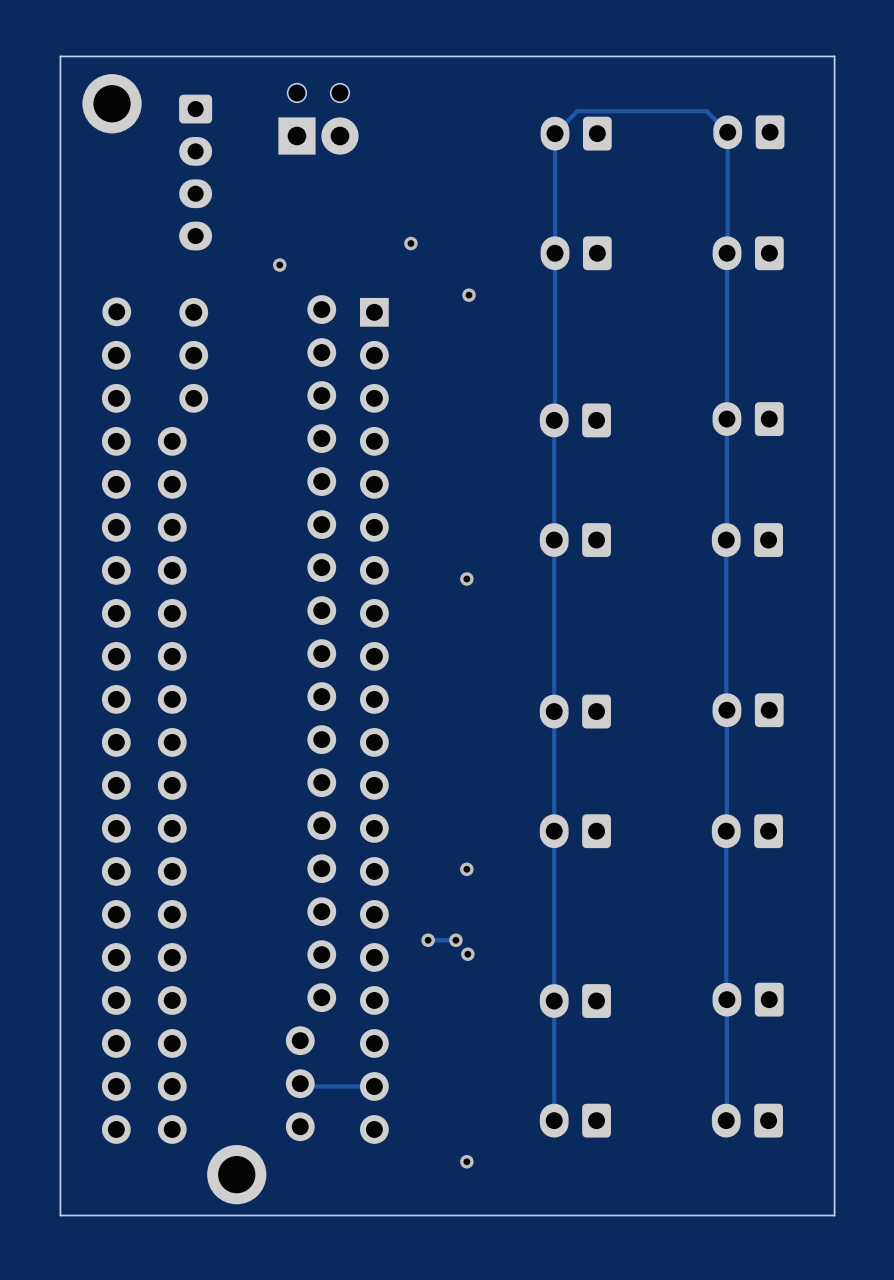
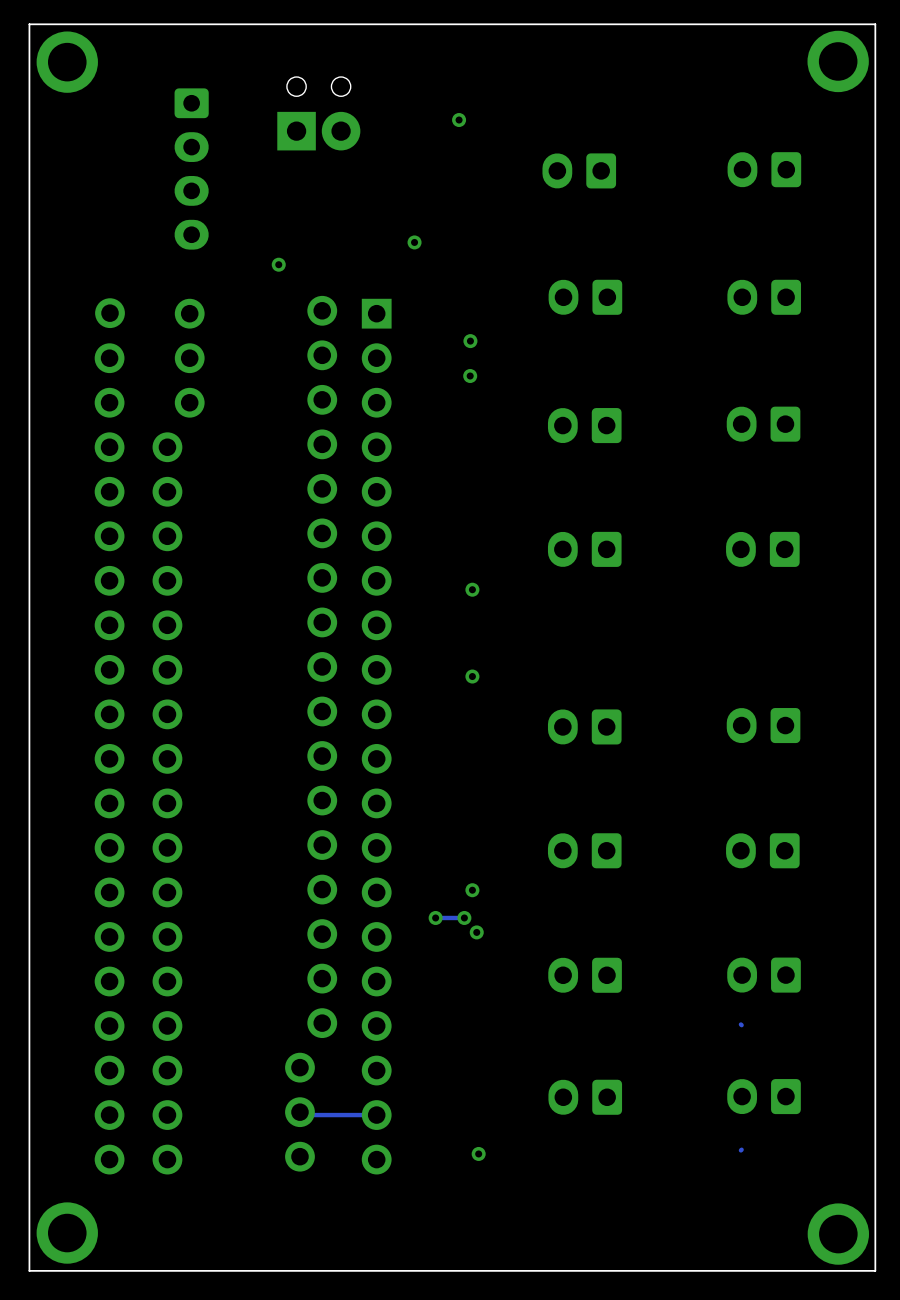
board edge: (834, 56) (60, 56) (60, 1215) (834, 1215) (834, 56) -> (875, 24) (875, 1270) (29, 1270) (29, 24) (875, 24)
part: none -> (838, 61)
part position: (112, 103) -> (67, 62)
via: none -> (459, 120)
part: (748, 132) -> none
part: (576, 133) -> none
part: none -> (764, 169)
part: none -> (579, 170)
part: (576, 253) -> none
part: (748, 253) -> none
track: none -> (733, 294) (733, 295)
via: (469, 295) -> none
part: none -> (585, 297)
part: none -> (764, 297)
via: none -> (470, 341)
via: none -> (470, 376)
track: (727, 418) (727, 132) (706, 111) (577, 111) (555, 133) (554, 1120) -> none
track: (726, 419) (726, 998) -> none
via: none -> (472, 676)
via: none -> (435, 917)
via: none -> (464, 917)
via: none -> (476, 932)
via: (428, 940) -> none
track: (455, 940) (428, 940) -> (464, 917) (435, 917)
via: (455, 940) -> none
part: none -> (585, 975)
part: none -> (764, 975)
via: (467, 954) -> none
track: (726, 999) (726, 1119) -> none
part: (748, 999) -> none
part: (575, 1001) -> none
part: none -> (764, 1096)
part: none -> (585, 1097)
part: (575, 1120) -> none
part: (747, 1120) -> none
via position: (466, 1161) -> (478, 1153)
part position: (236, 1174) -> (67, 1233)
part: none -> (838, 1234)

